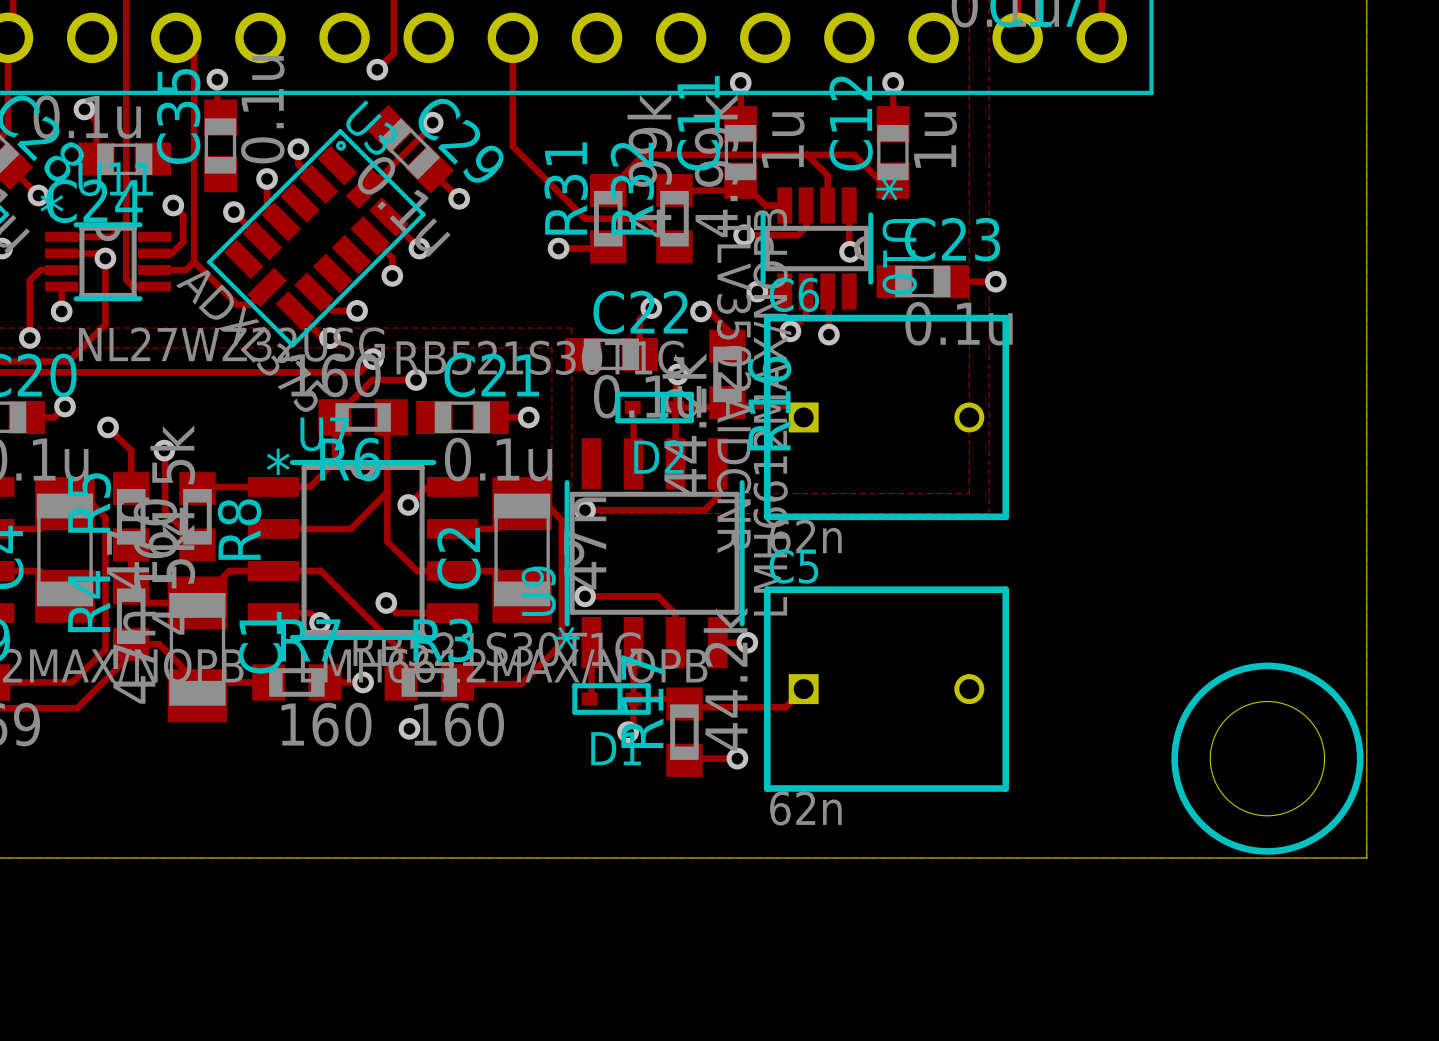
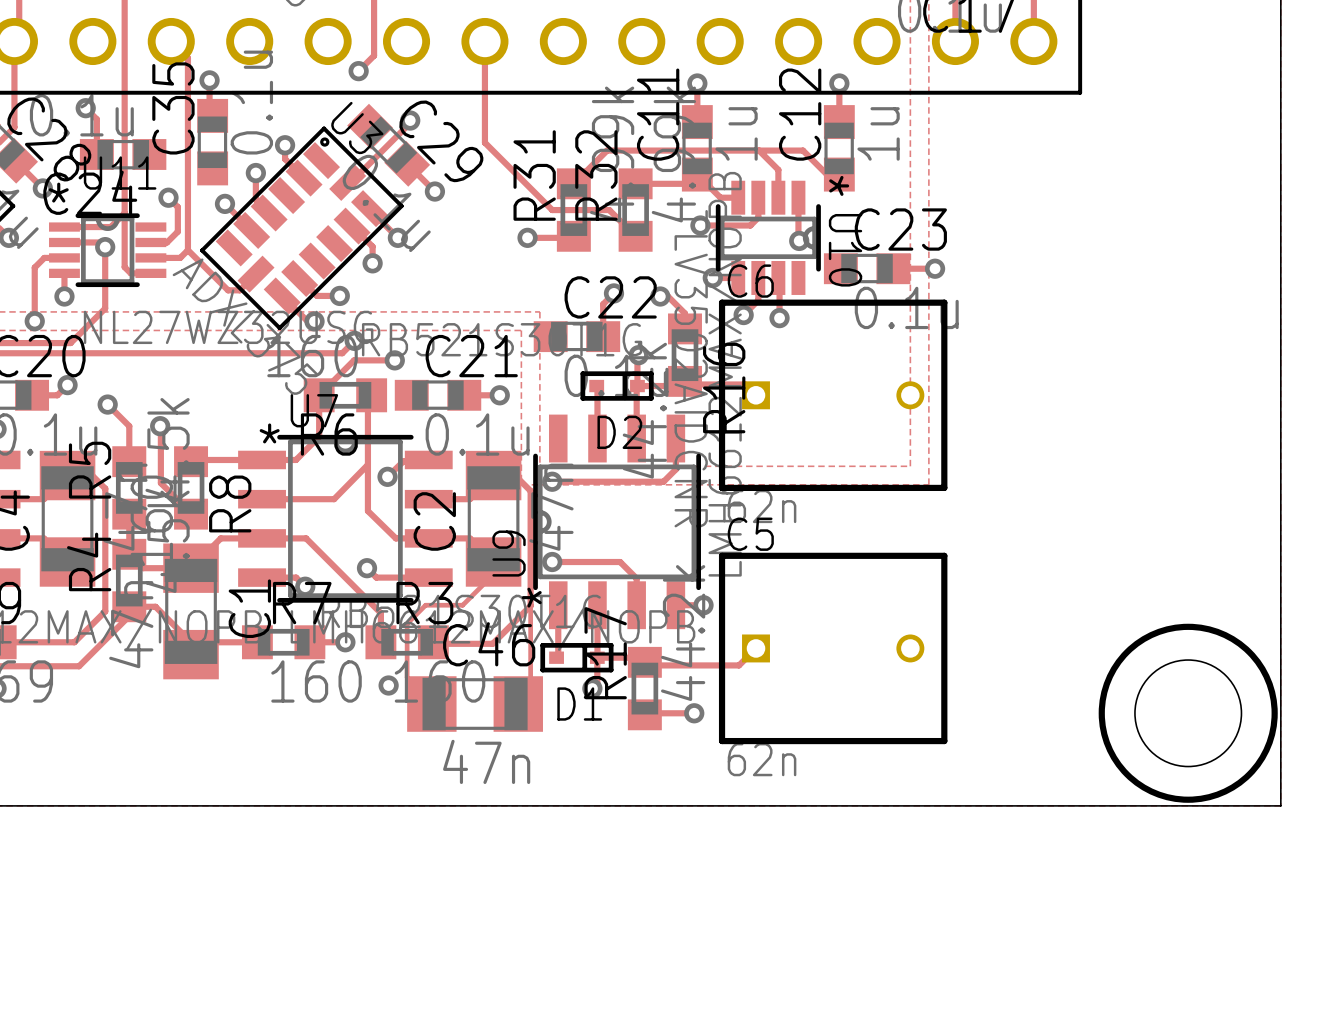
track: none -> (493, 562) (493, 574) (462, 605) (425, 605) (407, 623) (407, 677)
track: none -> (530, 605) (530, 691) (518, 704)
C46: none -> 47n (475, 704)

